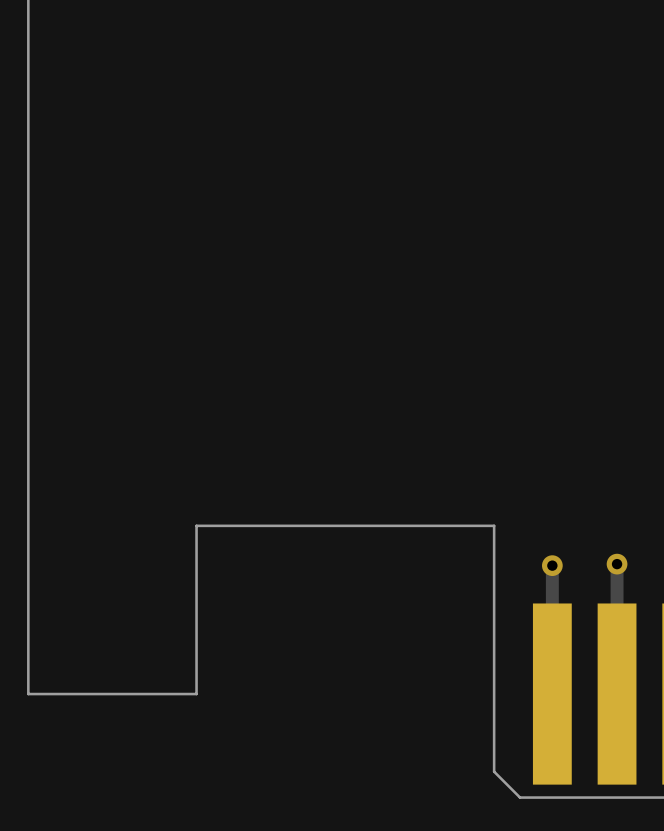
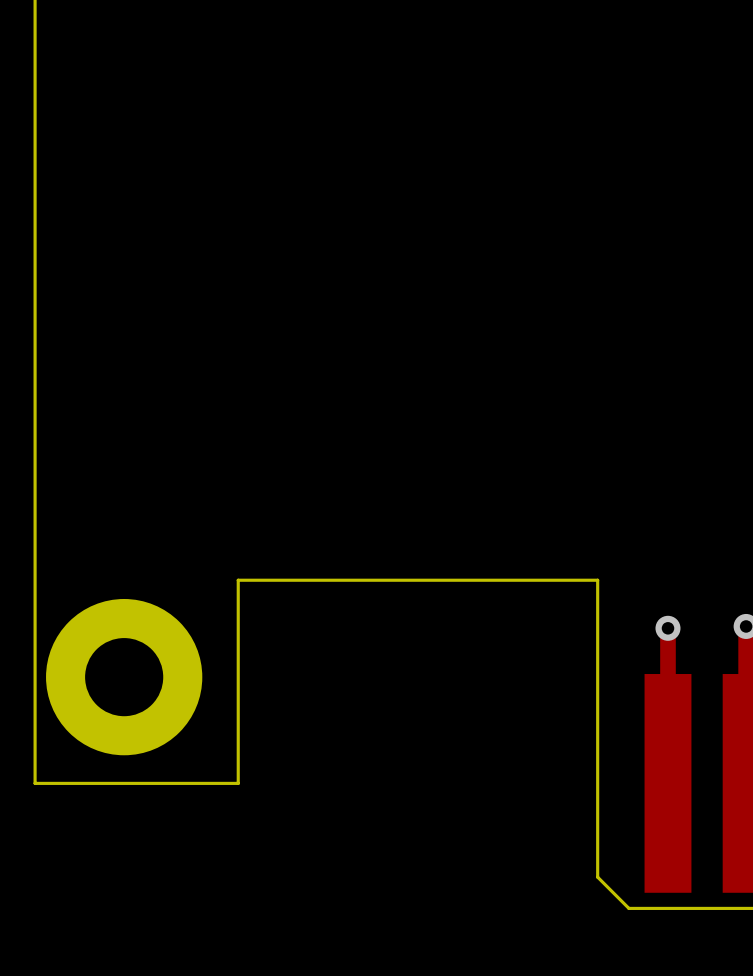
part: none -> (124, 677)

